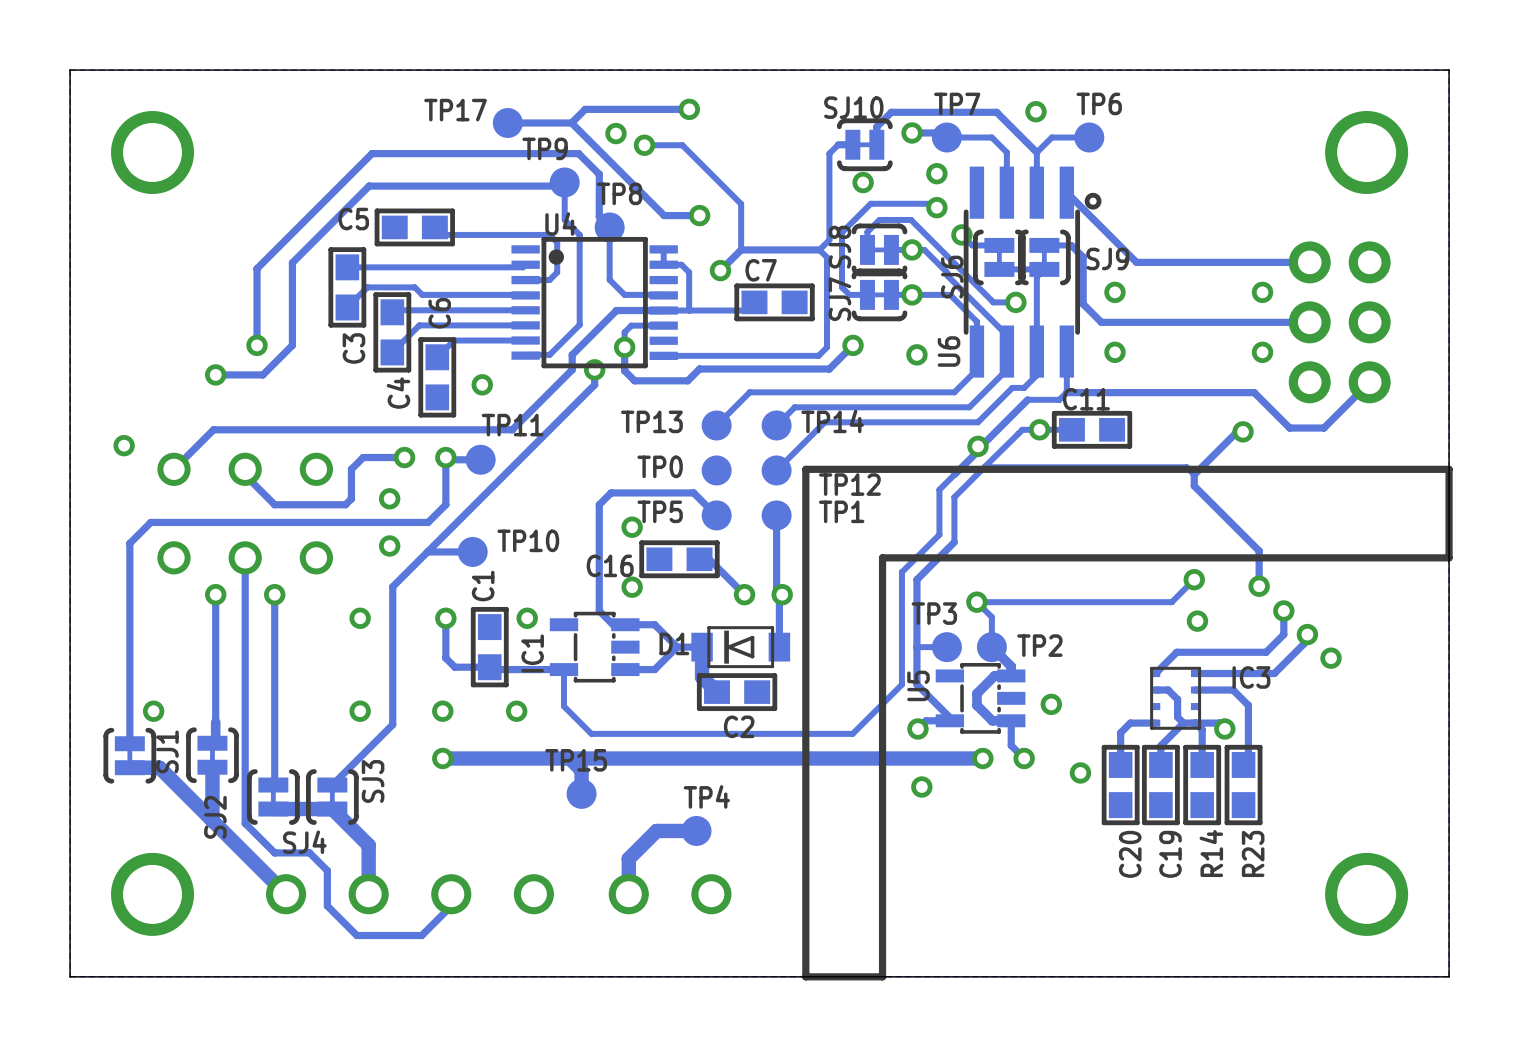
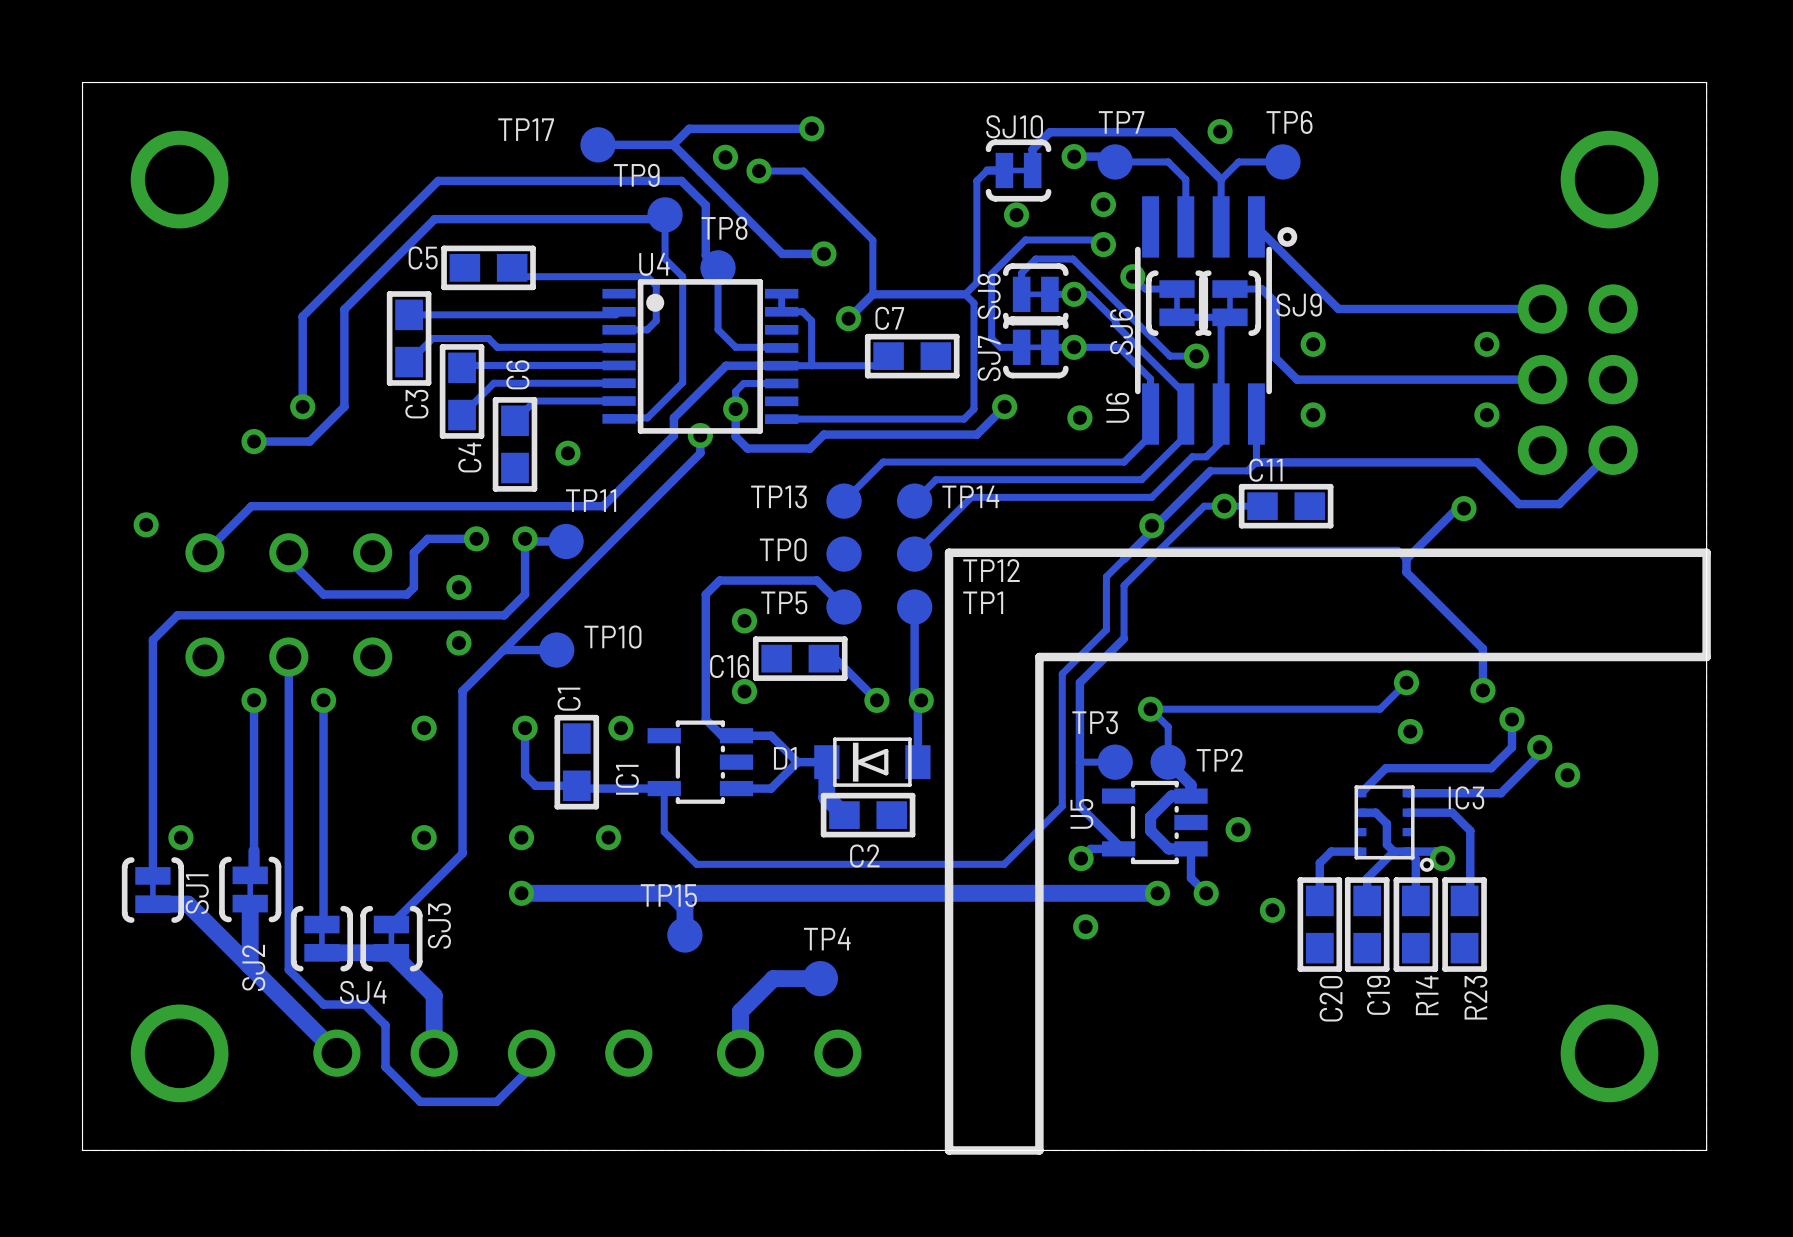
IC3 footprint: [1150, 666, 1202, 730] -> [1354, 785, 1434, 872]

